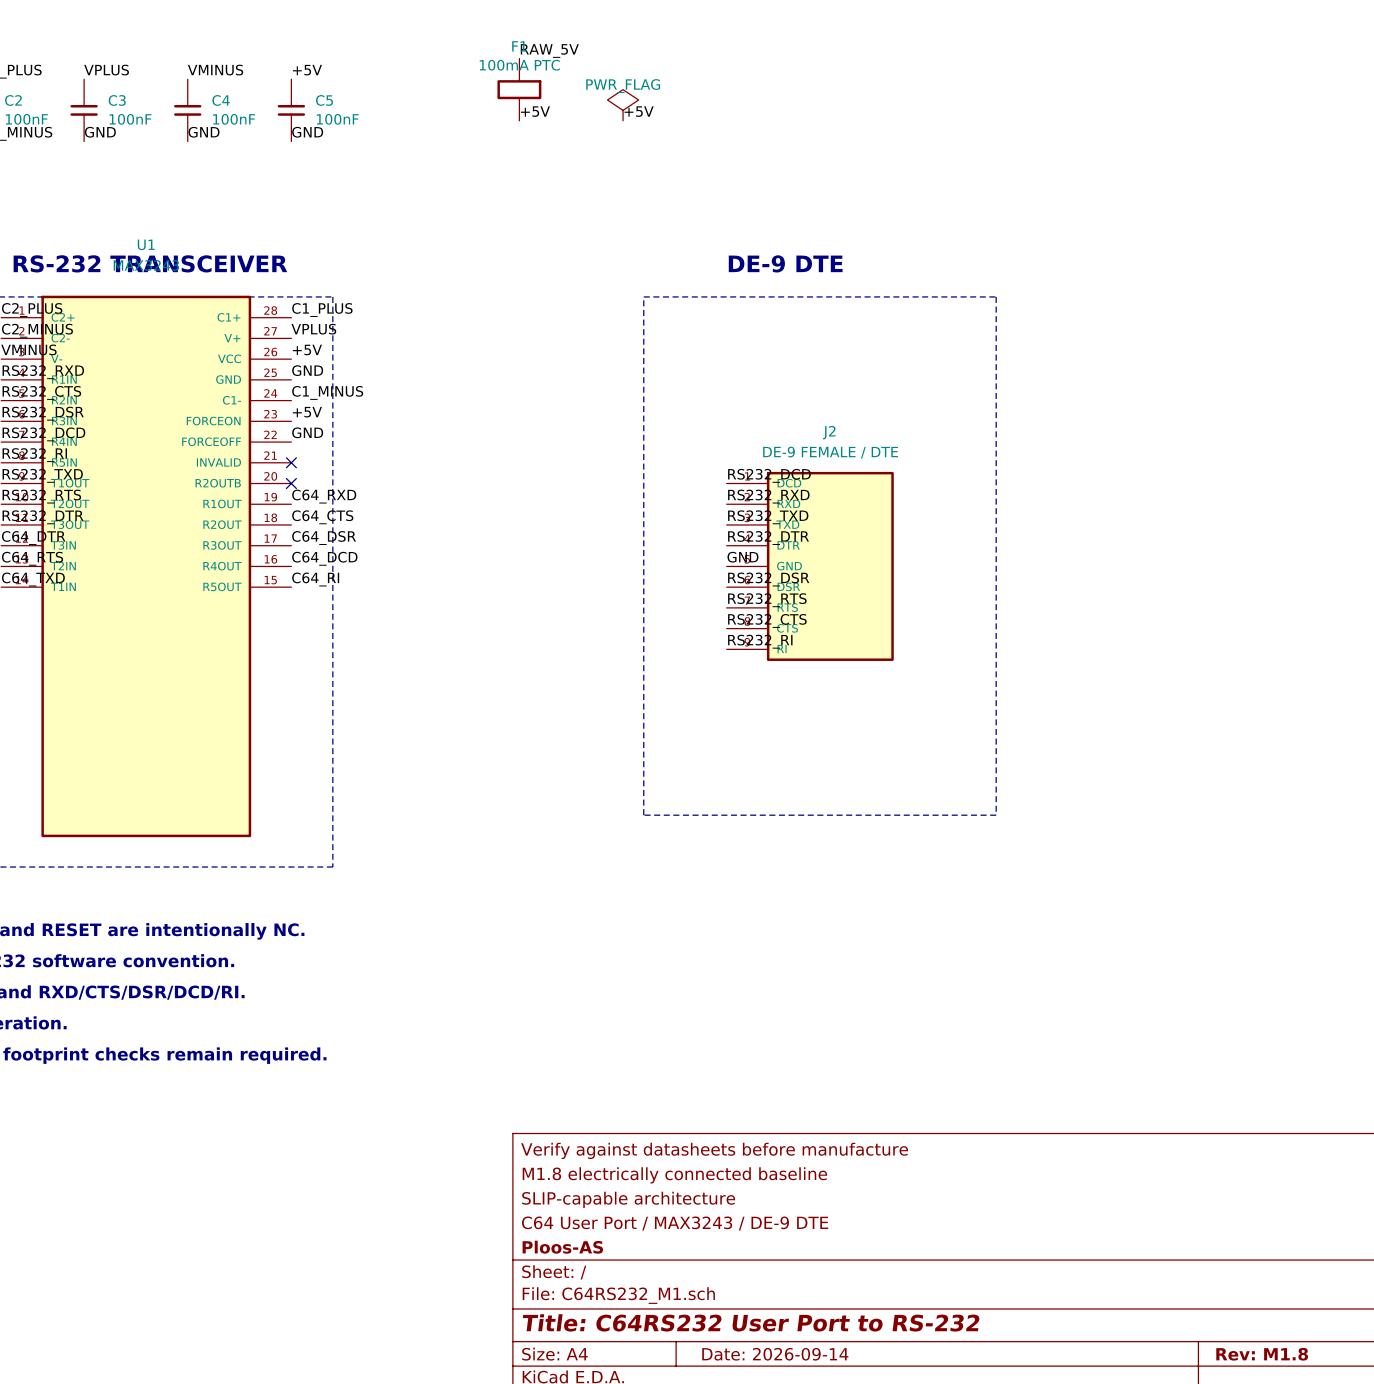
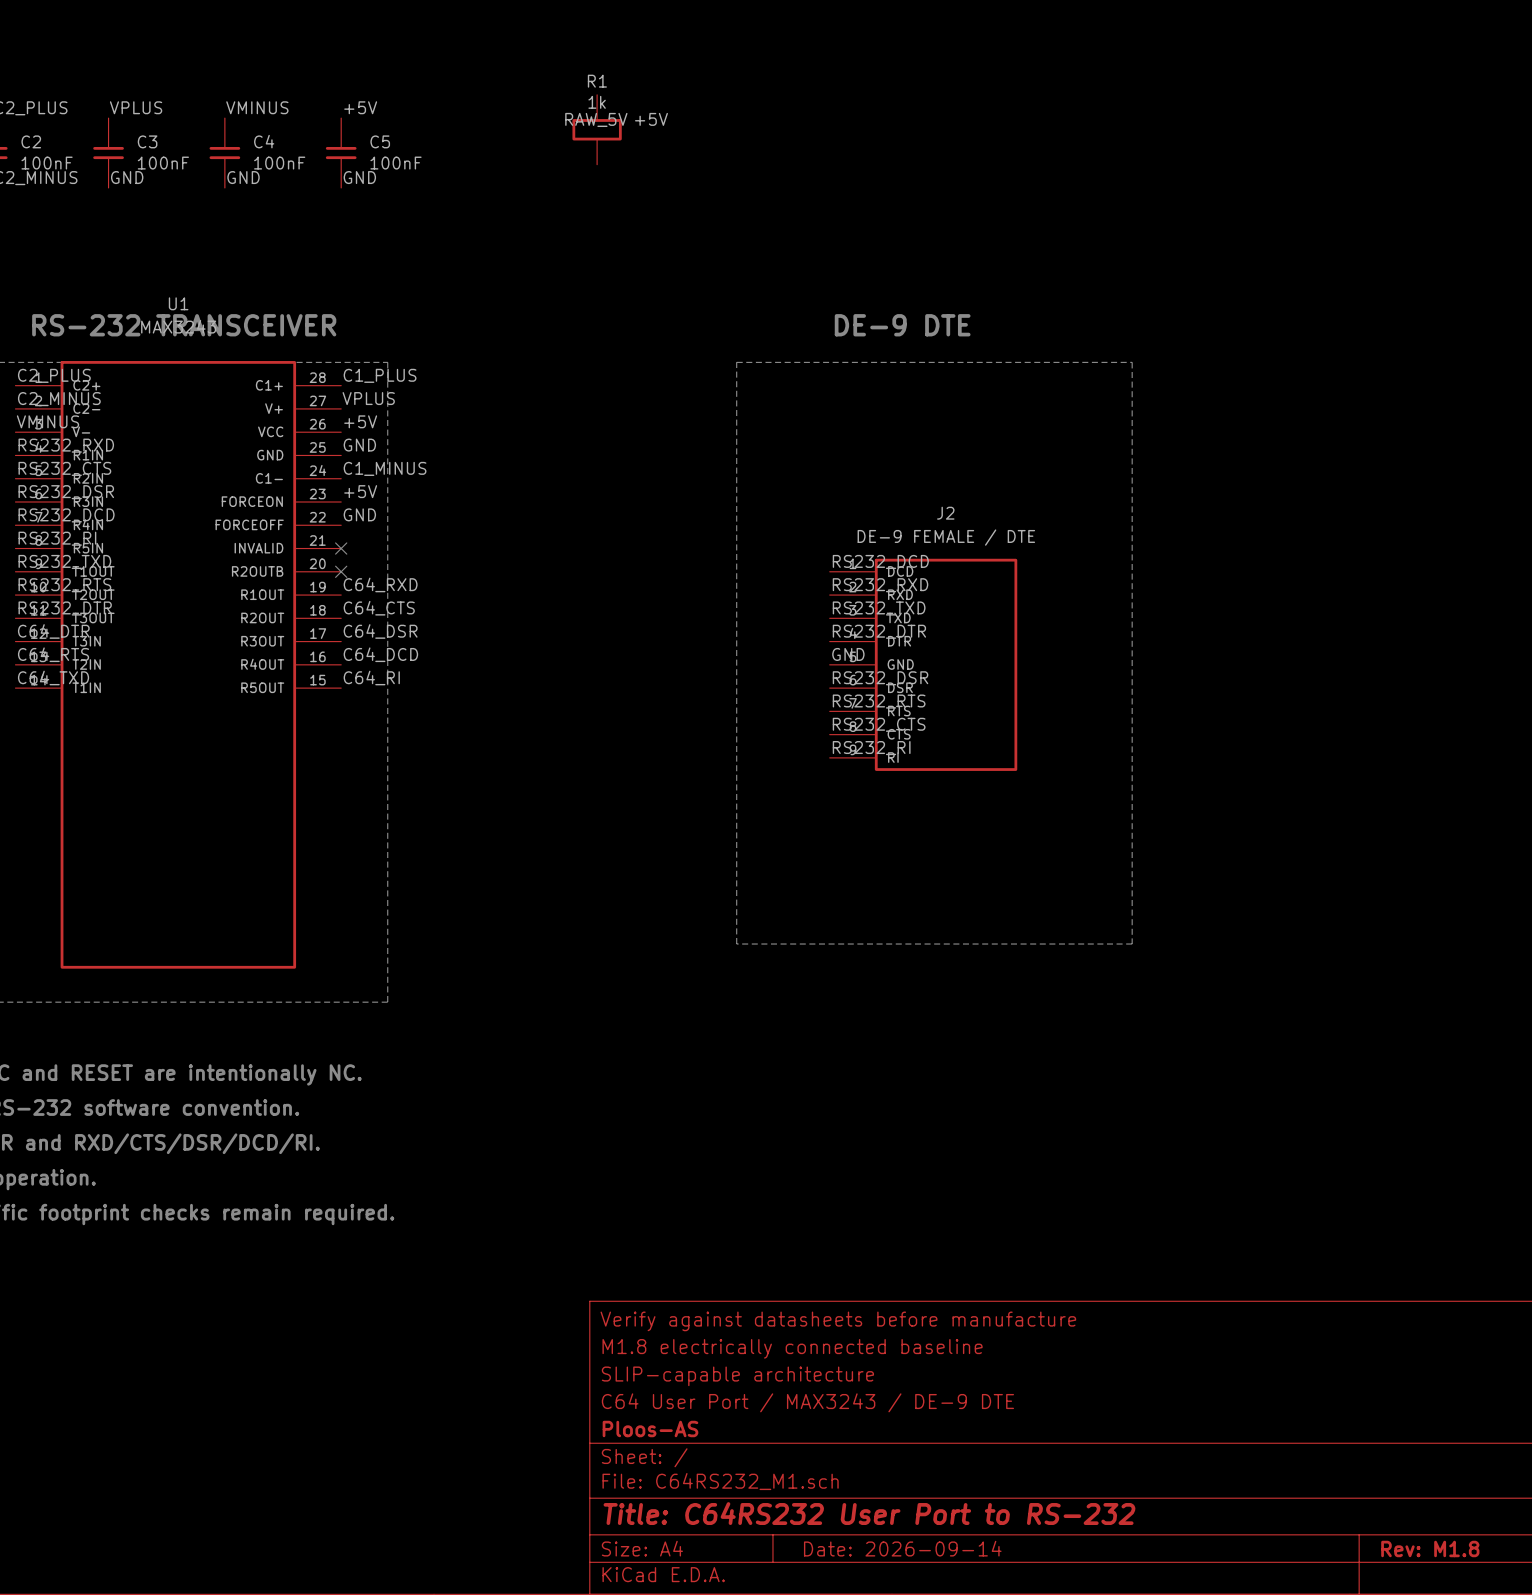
F1 name: F1 (519, 46) -> R1 (597, 81)
label position: RAW_5V (549, 51) -> RAW_5V (596, 119)
F1 value: 100mA PTC (519, 65) -> 1k (597, 102)
label: none -> +5V (651, 119)
power symbol: PWR_FLAG (623, 105) -> none
label: +5V (535, 111) -> none
label: +5V (639, 111) -> none

